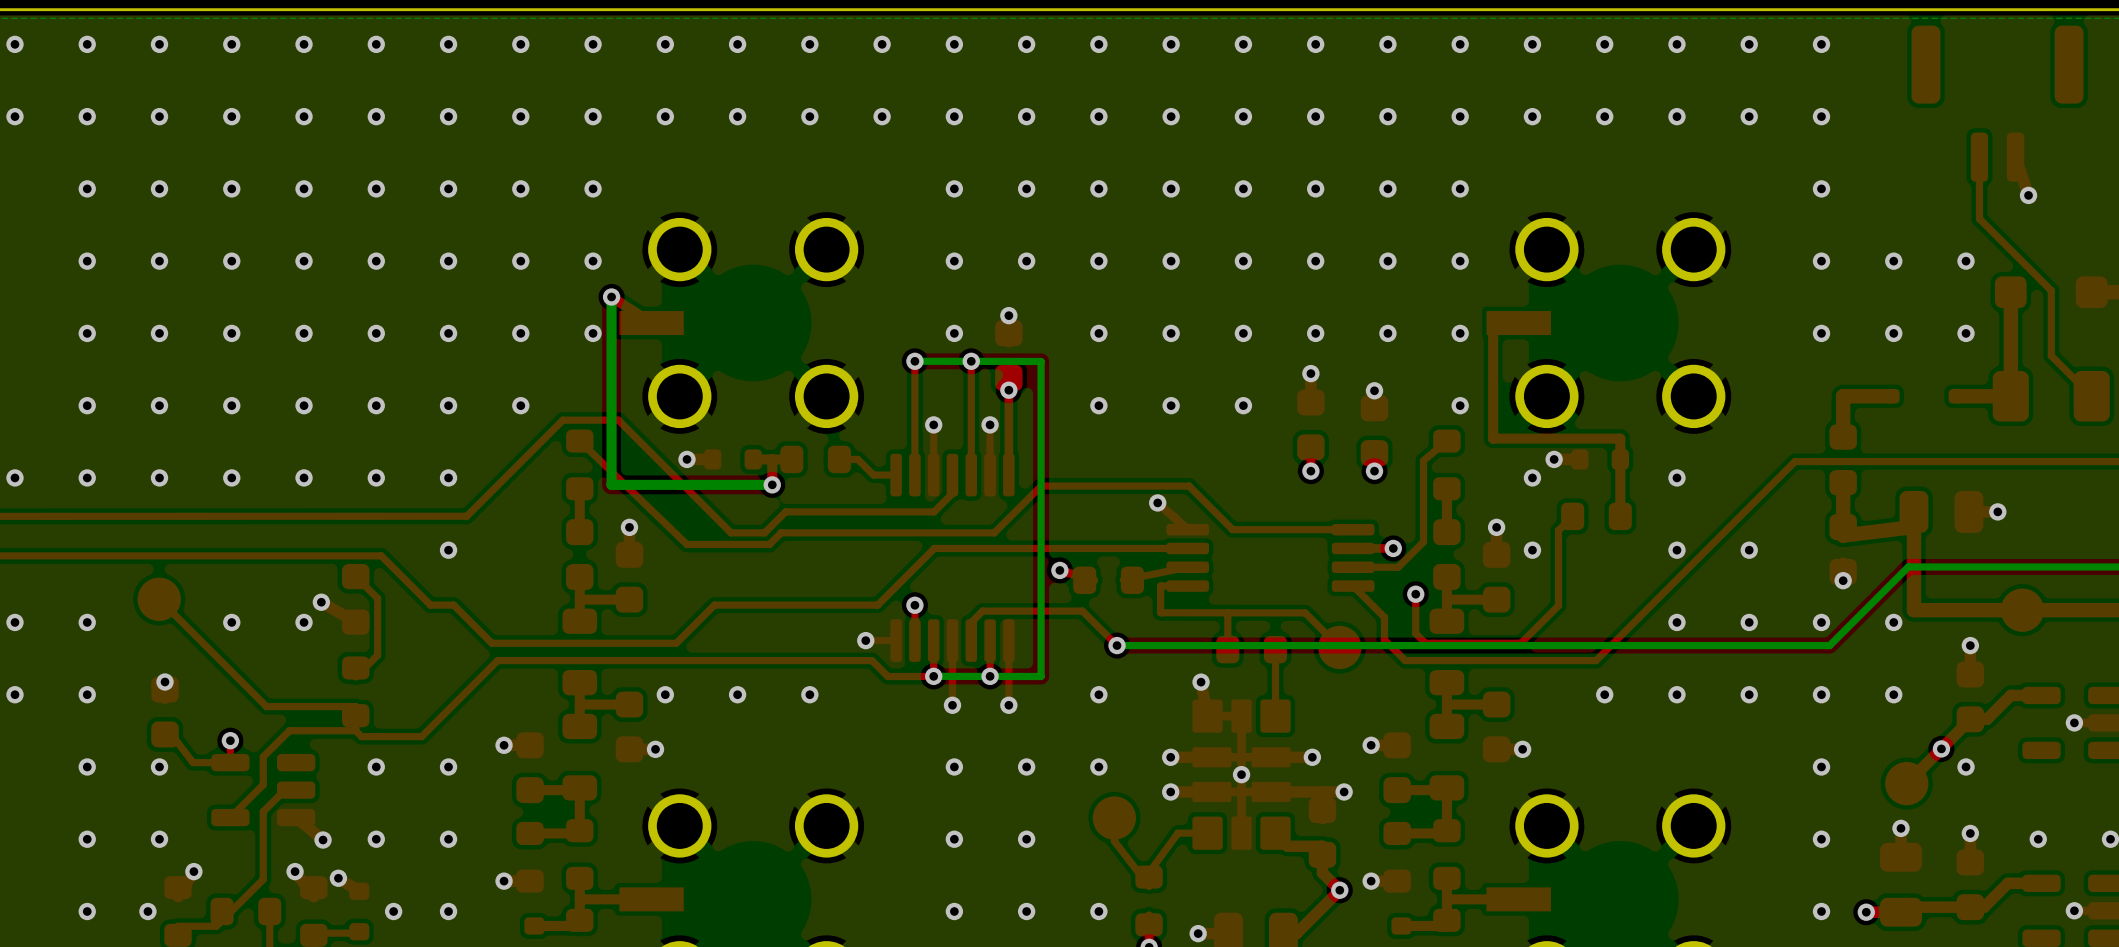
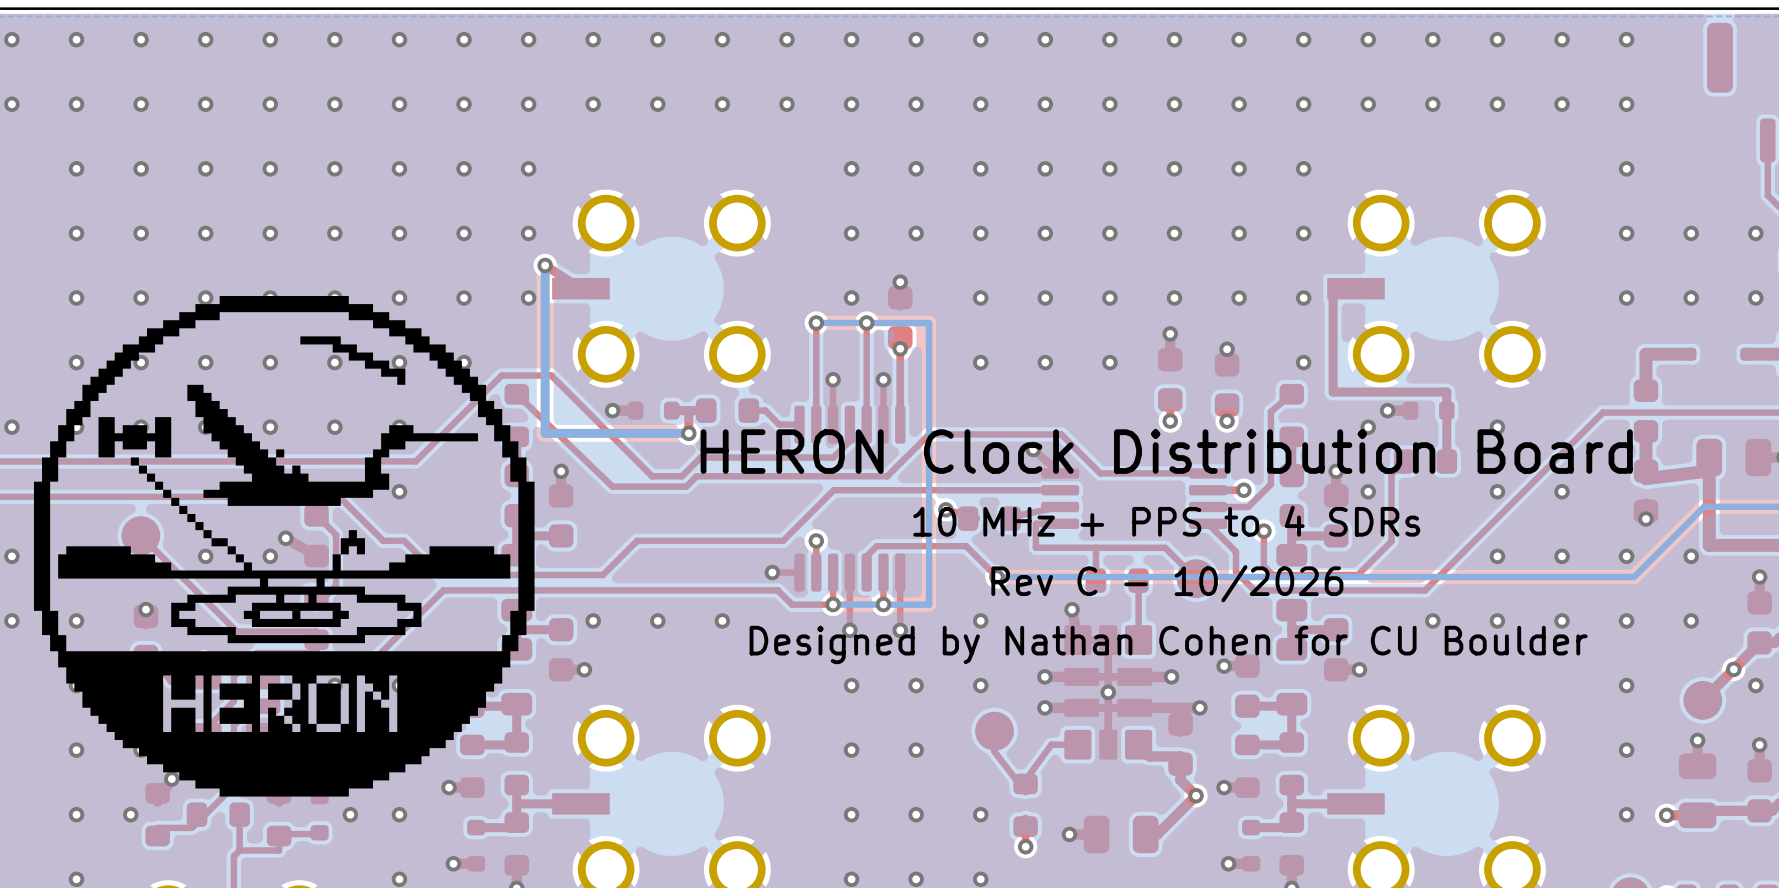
drawing: none -> [33, 296, 535, 797]
text: none -> HERON Clock Distribution Board (1166, 451)
text: none -> 10 MHz + PPS to 4 SDRs (1166, 521)
text: none -> Rev C - 10/2026 (1167, 583)
text: none -> Designed by Nathan Cohen for CU Boulder (1168, 644)

